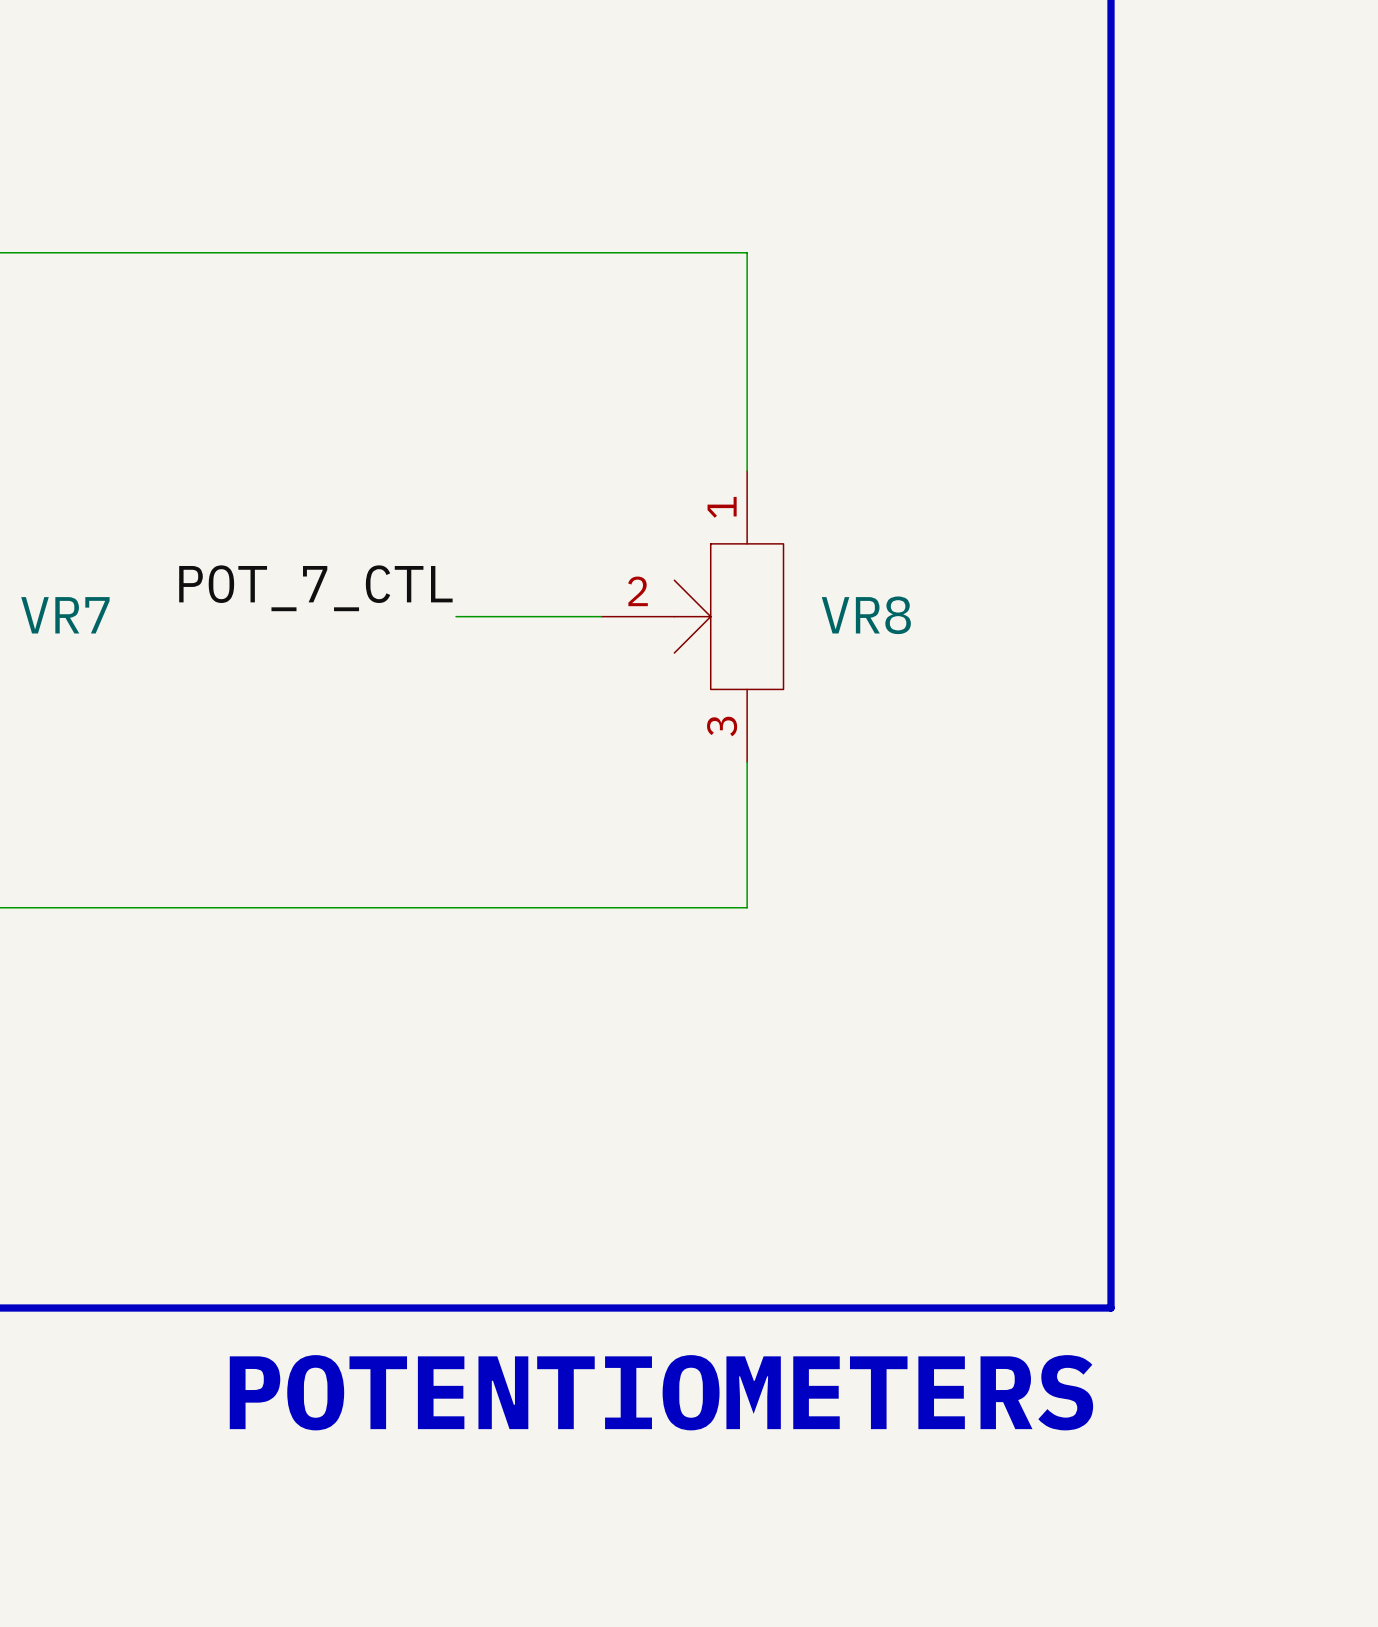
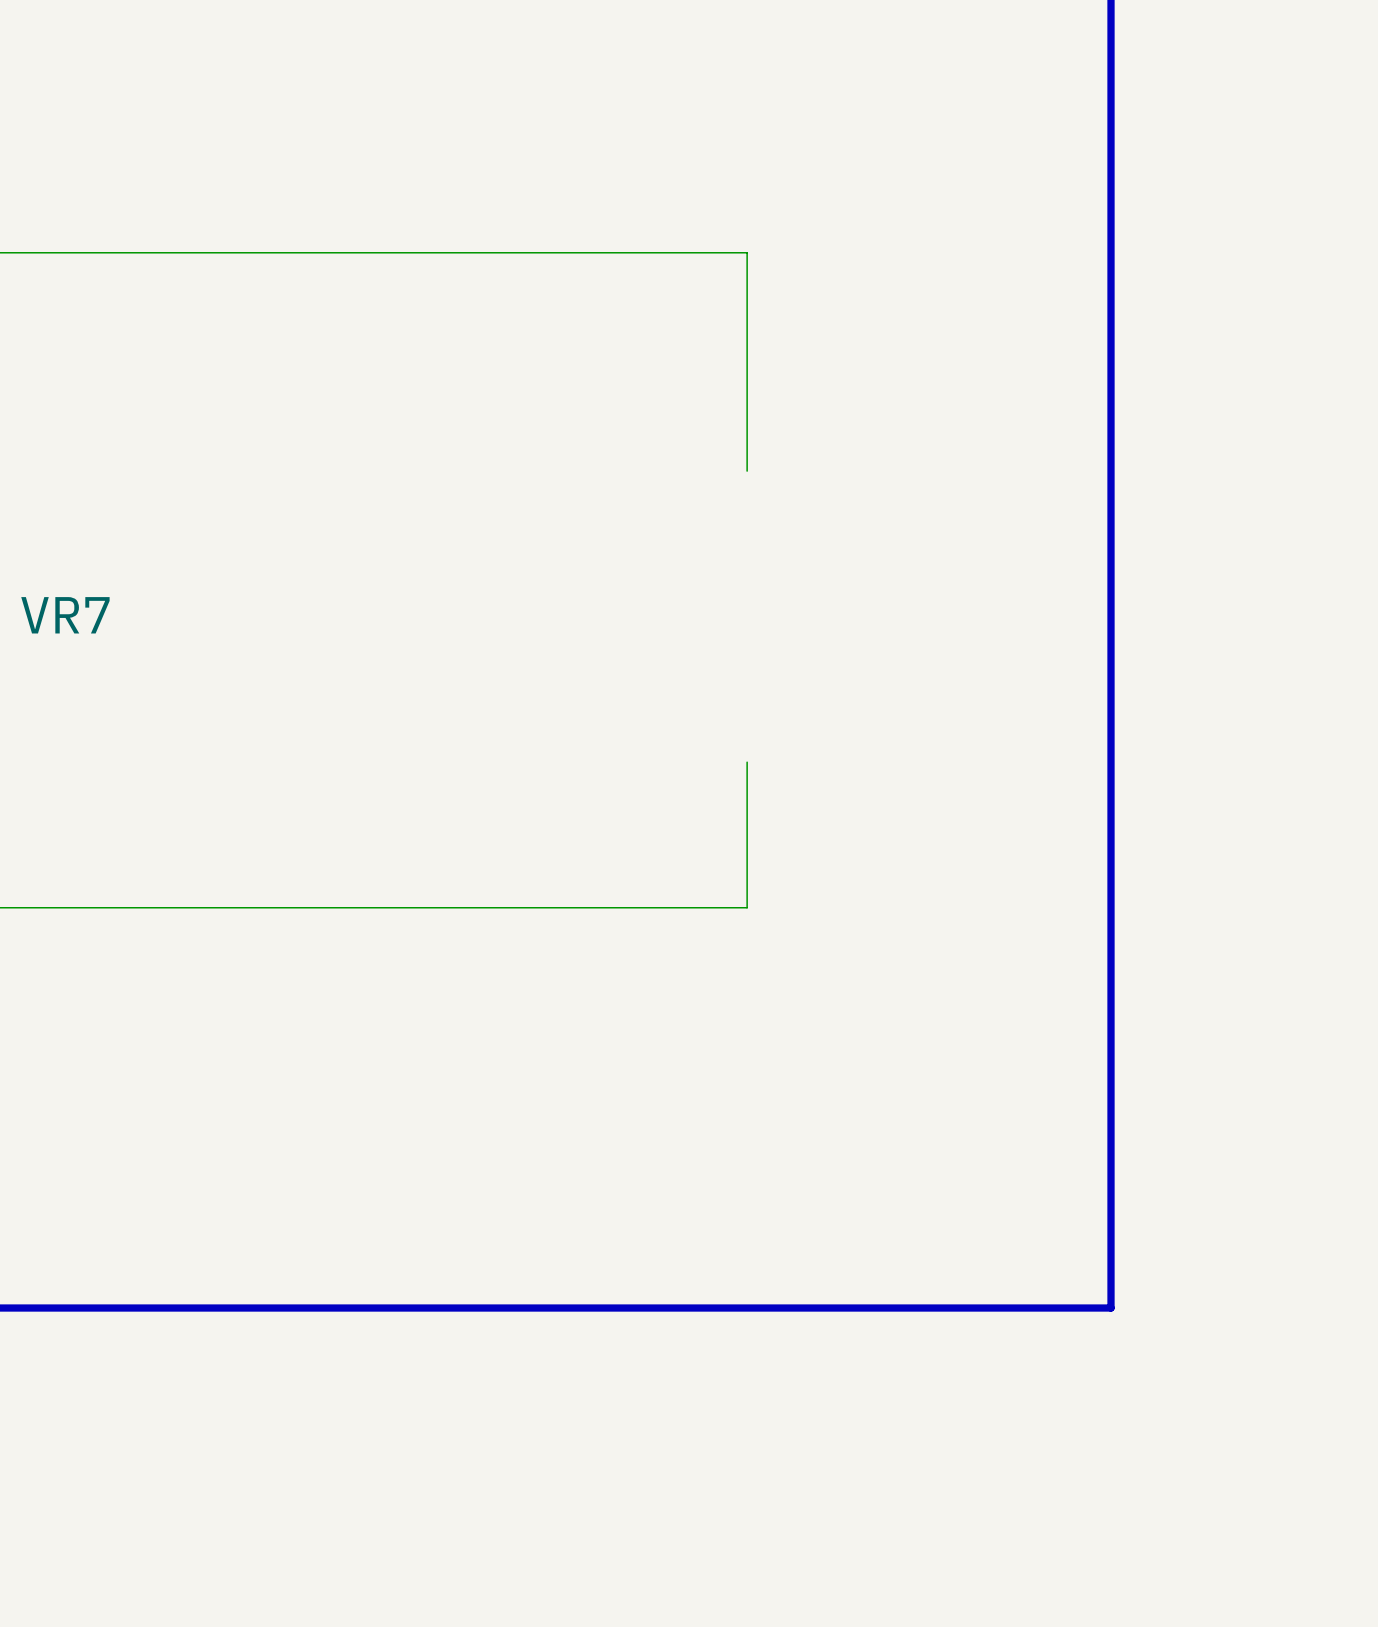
label: POT_7_CTL (315, 588) -> none
wire: (456, 616) (601, 616) -> none
VR8: (692, 616) -> none
text: POTENTIOMETERS (661, 1392) -> none

